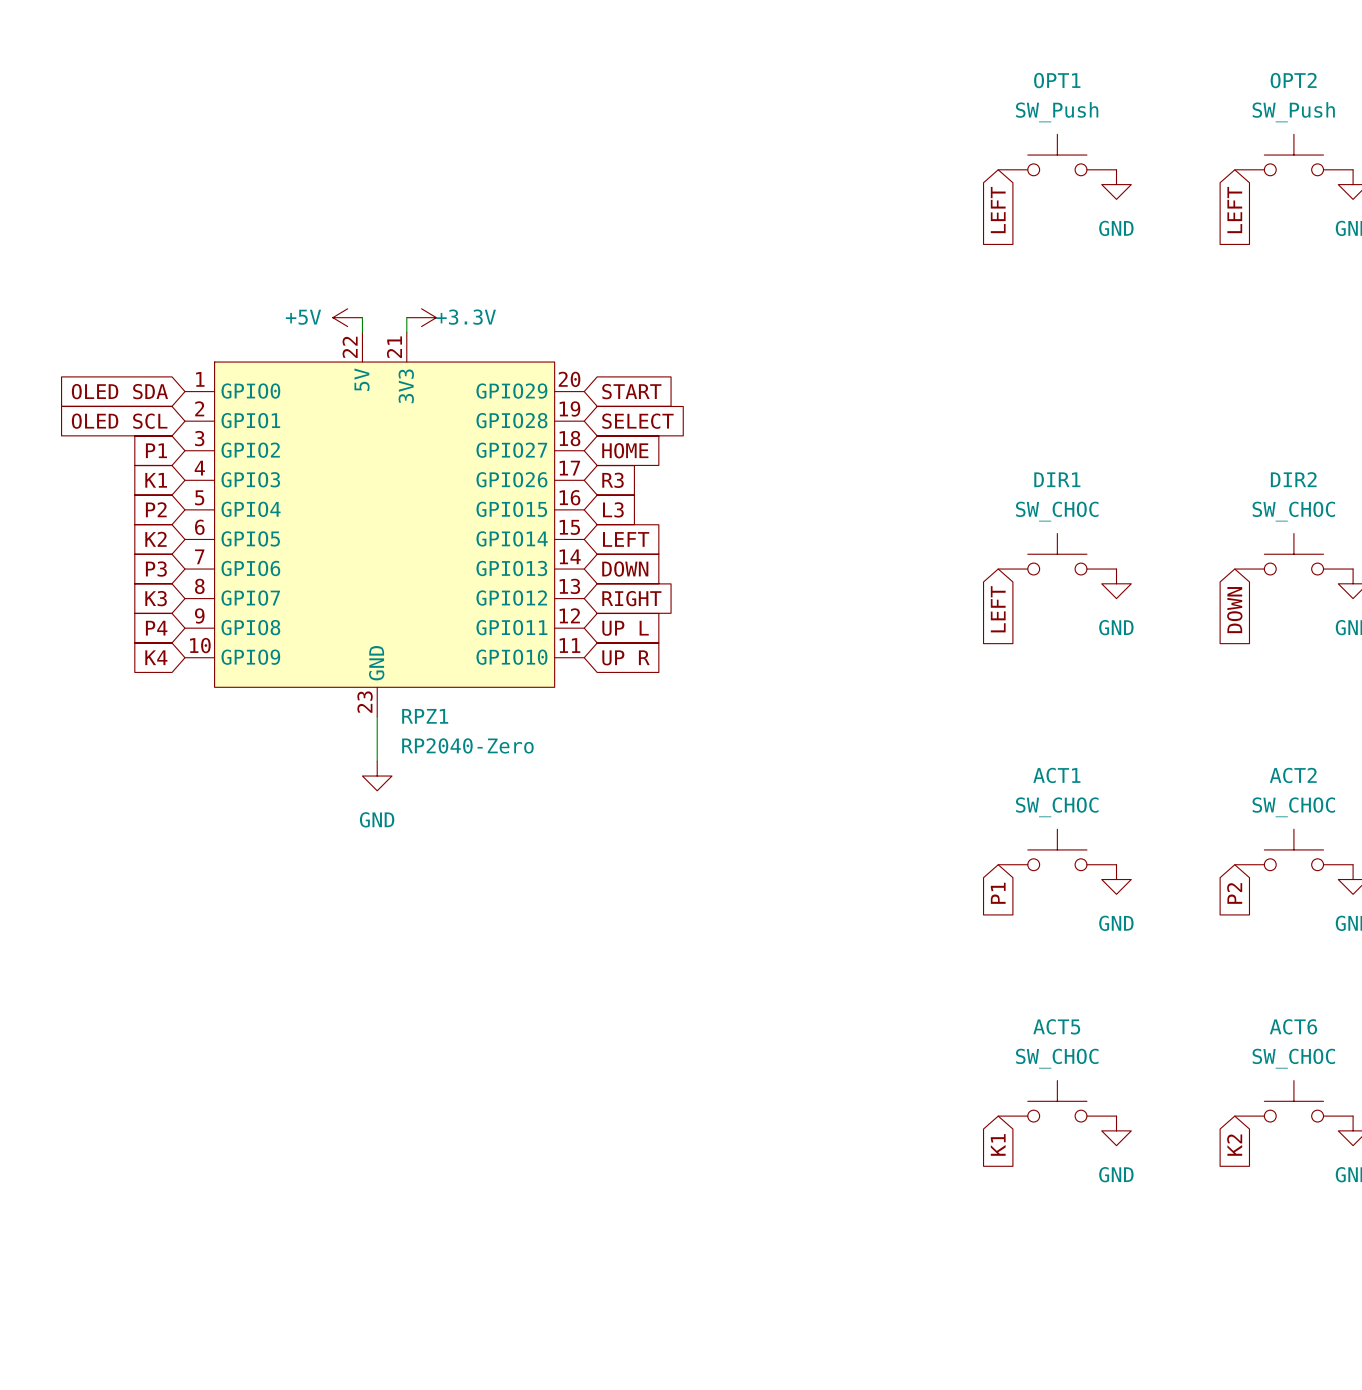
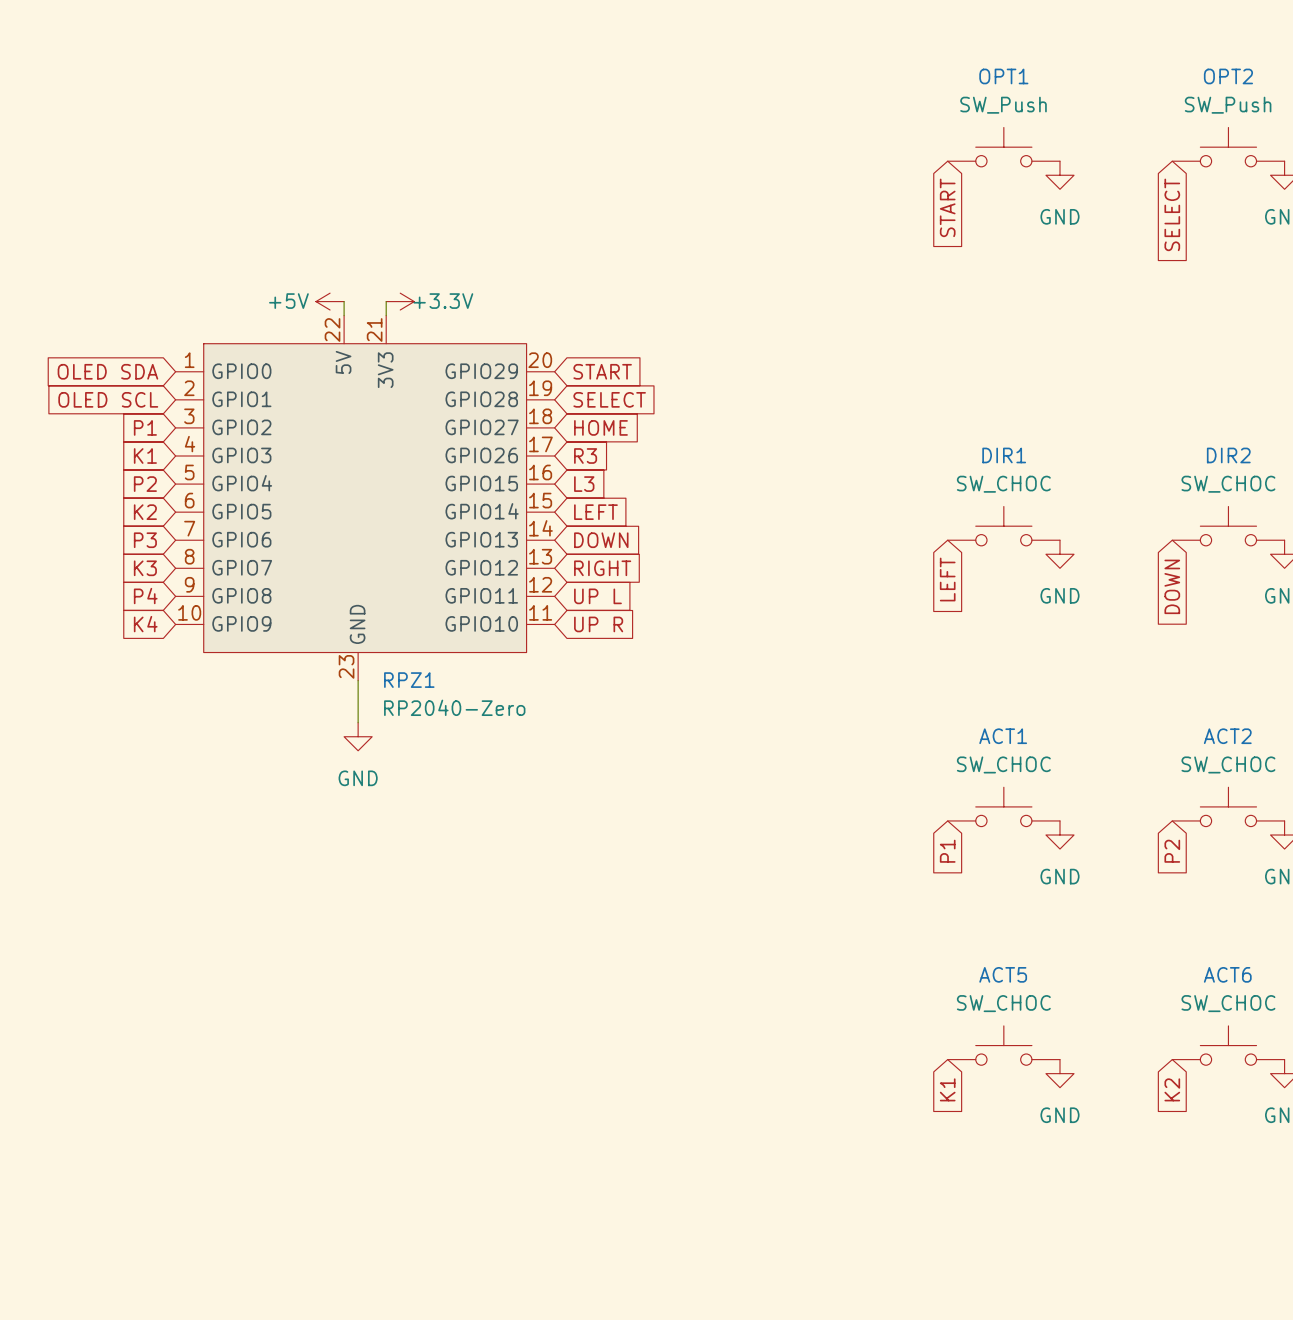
global label: LEFT (998, 210) -> START (947, 207)
global label: LEFT (1234, 210) -> SELECT (1172, 214)

